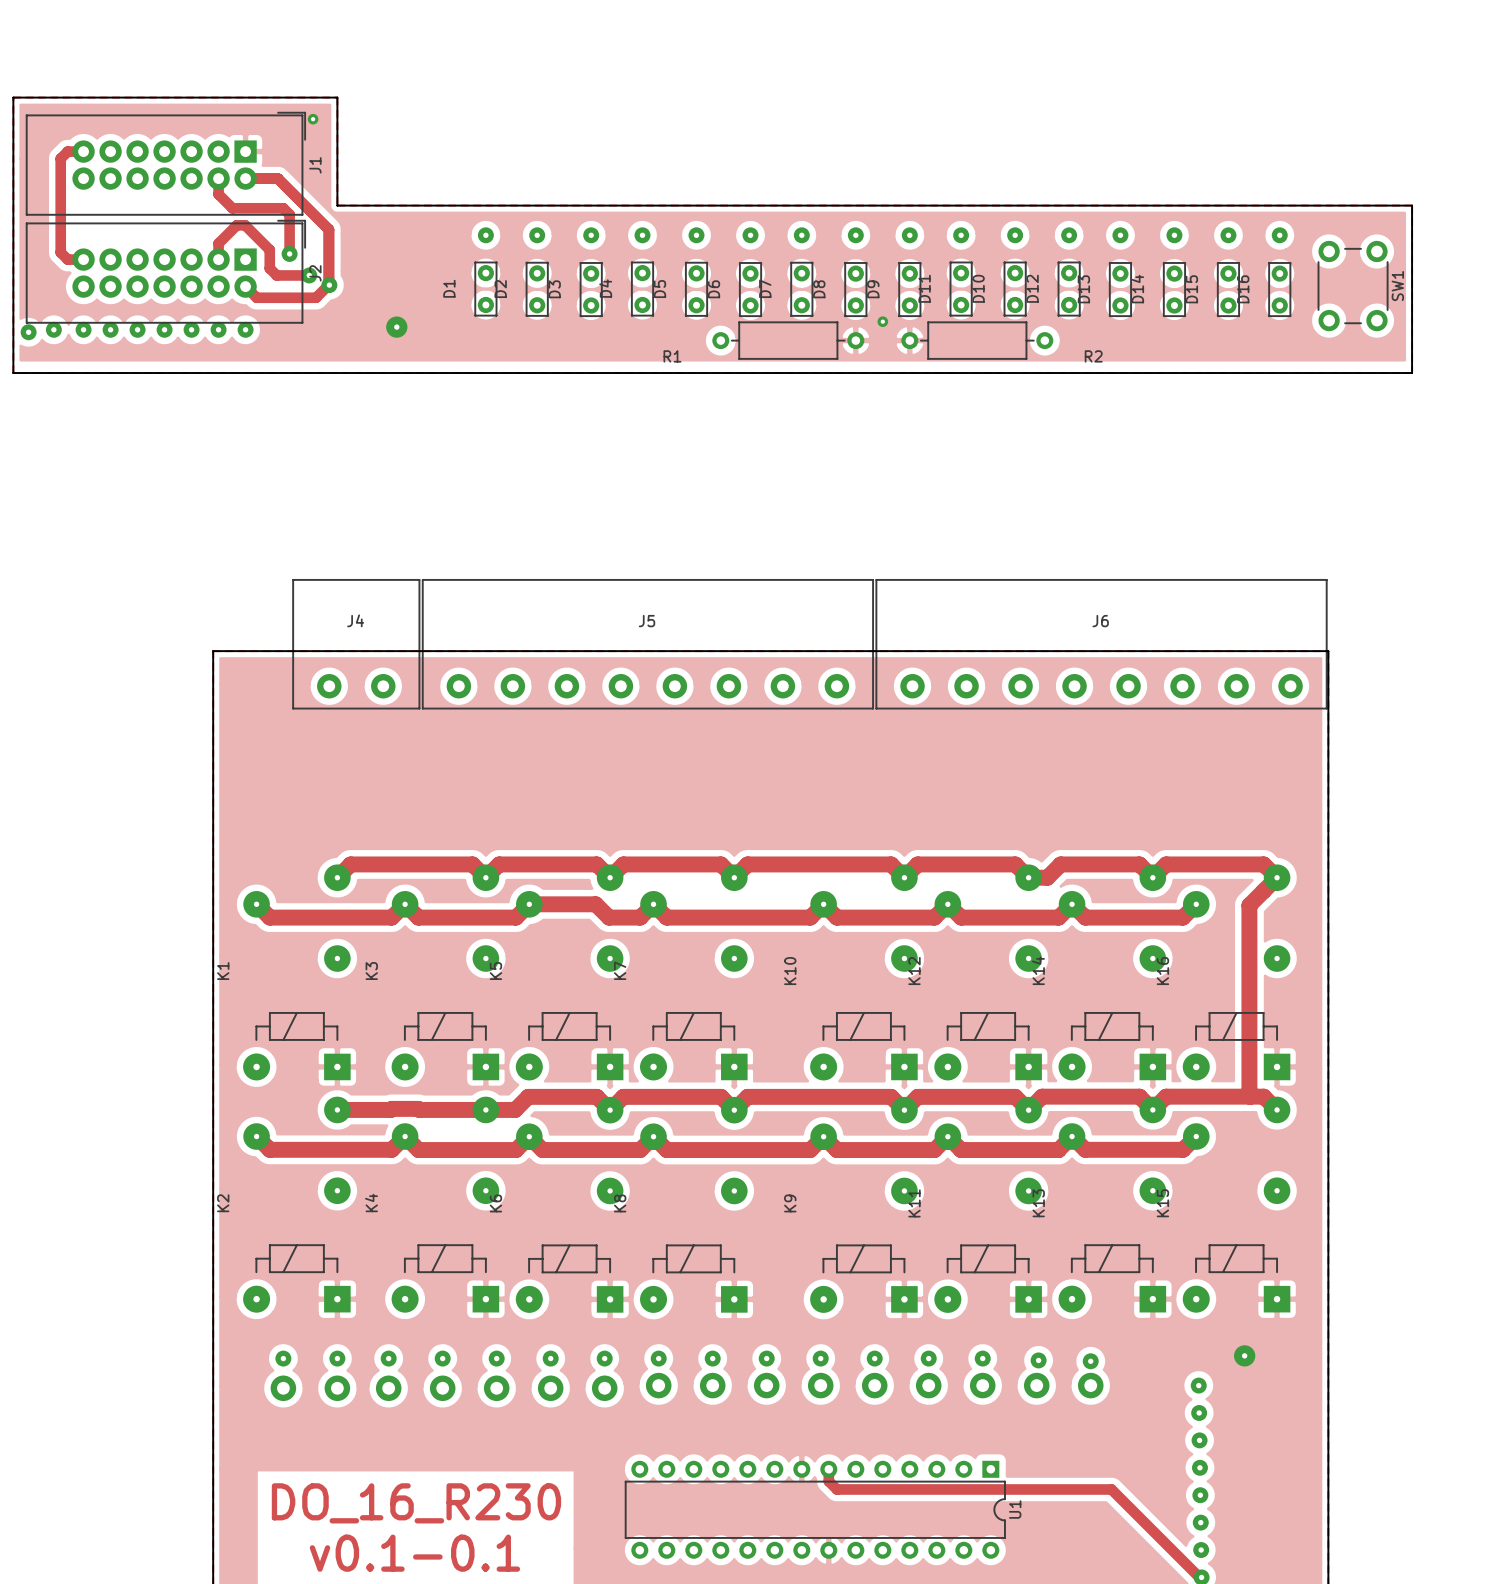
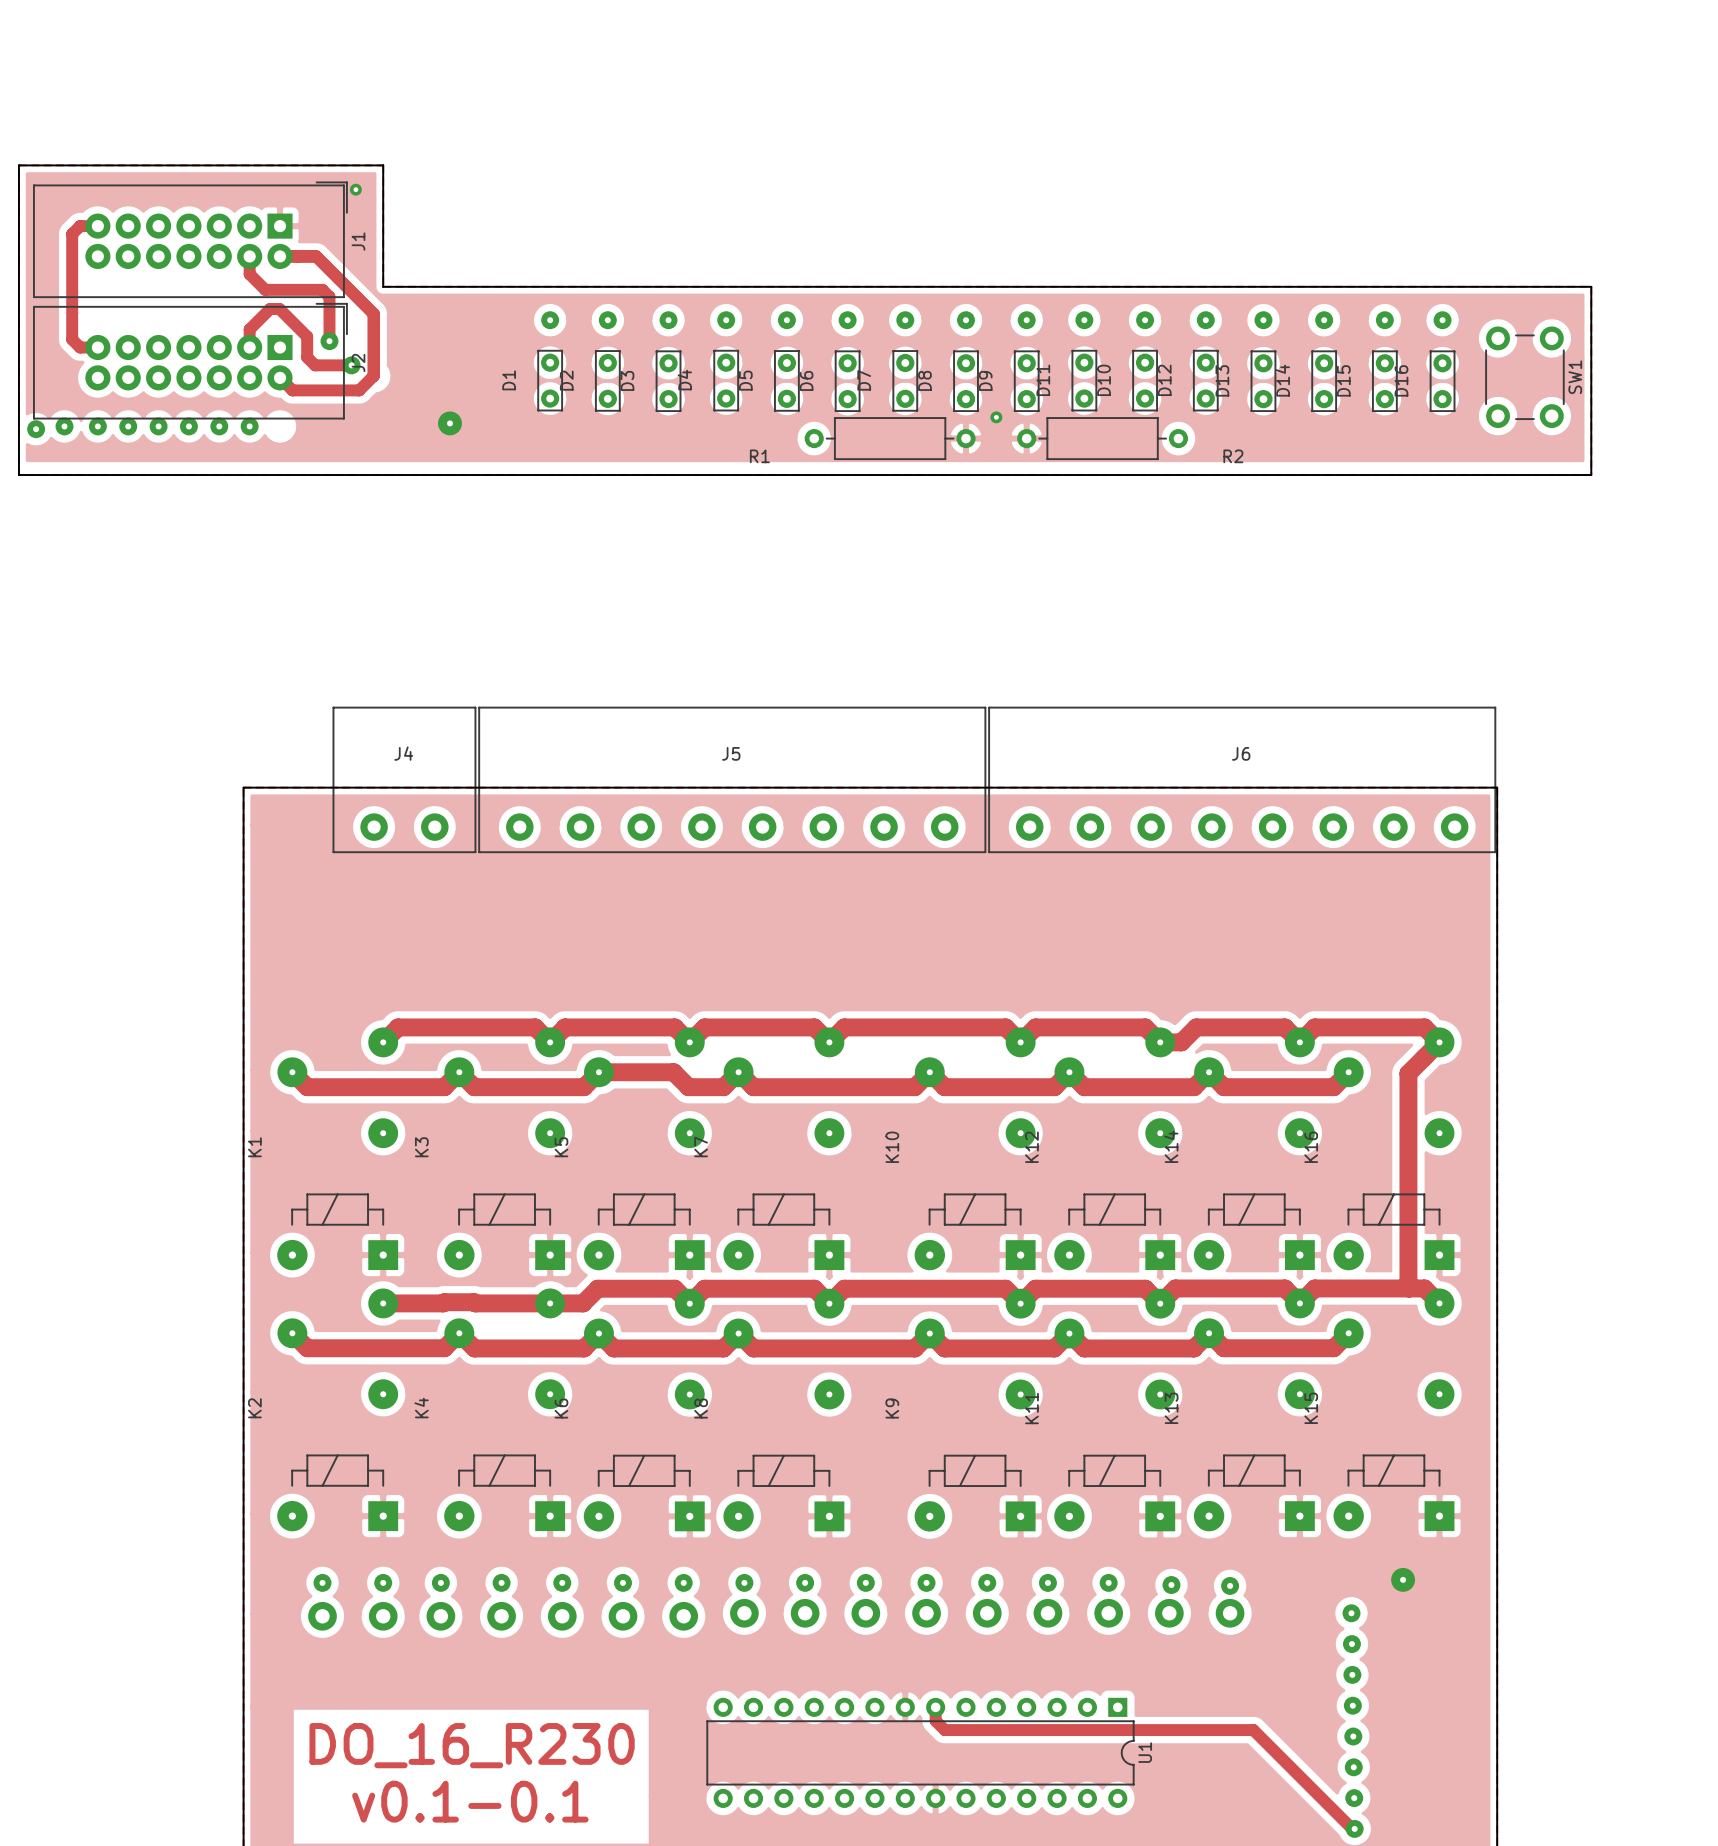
via: (329, 285) -> none
via: (245, 329) -> none

